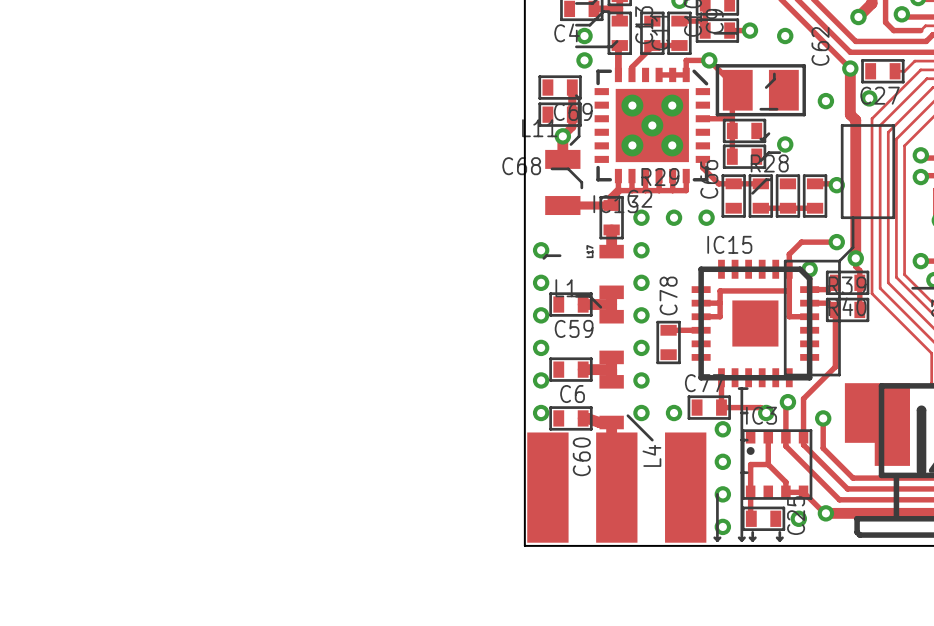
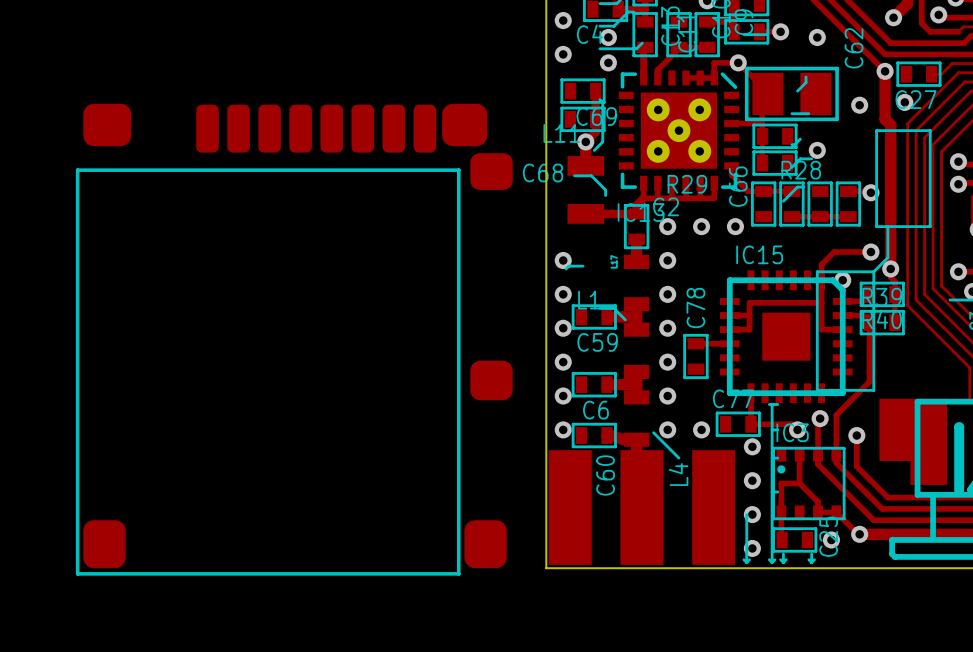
via: none -> (563, 20)
via: none -> (563, 54)
part: none -> (294, 339)

